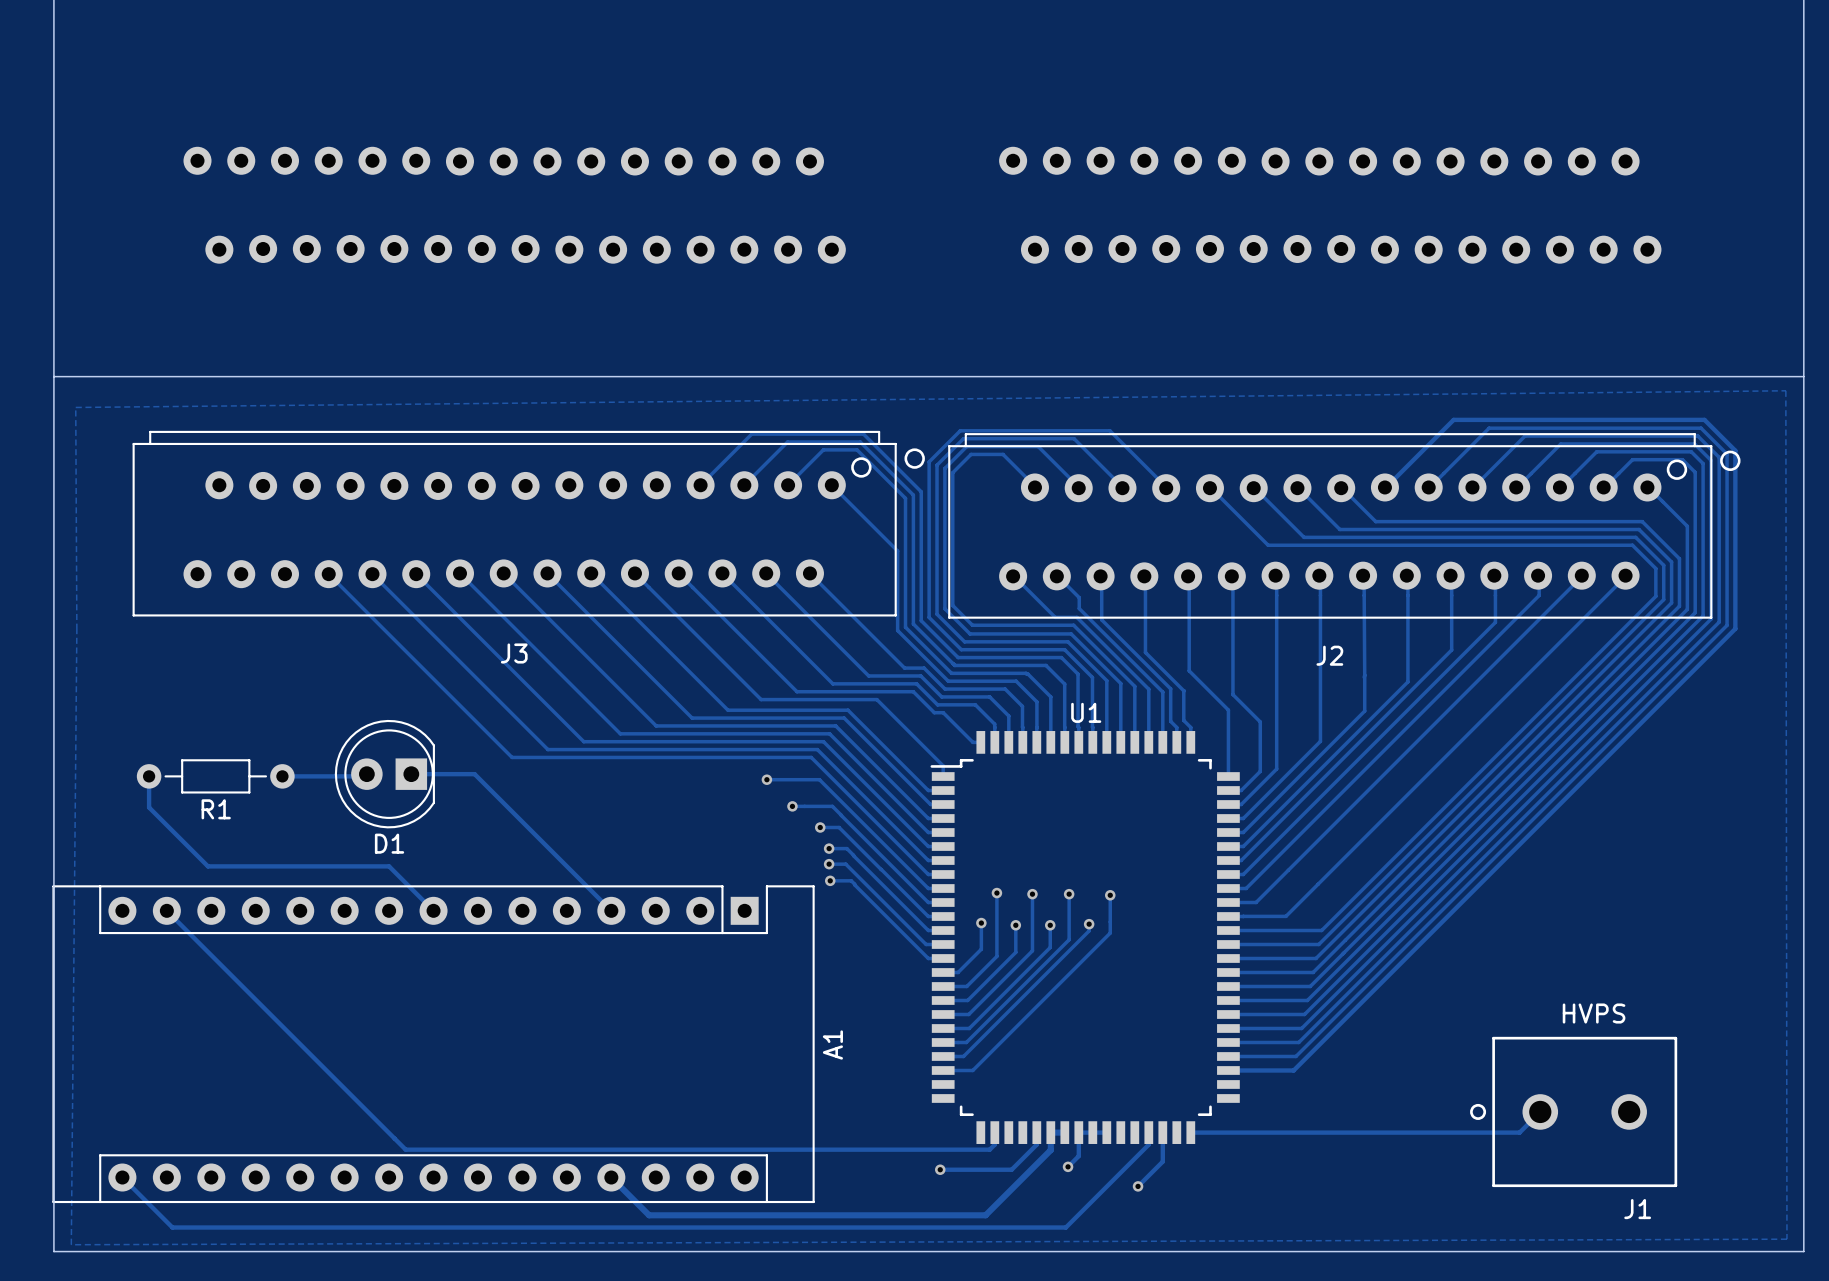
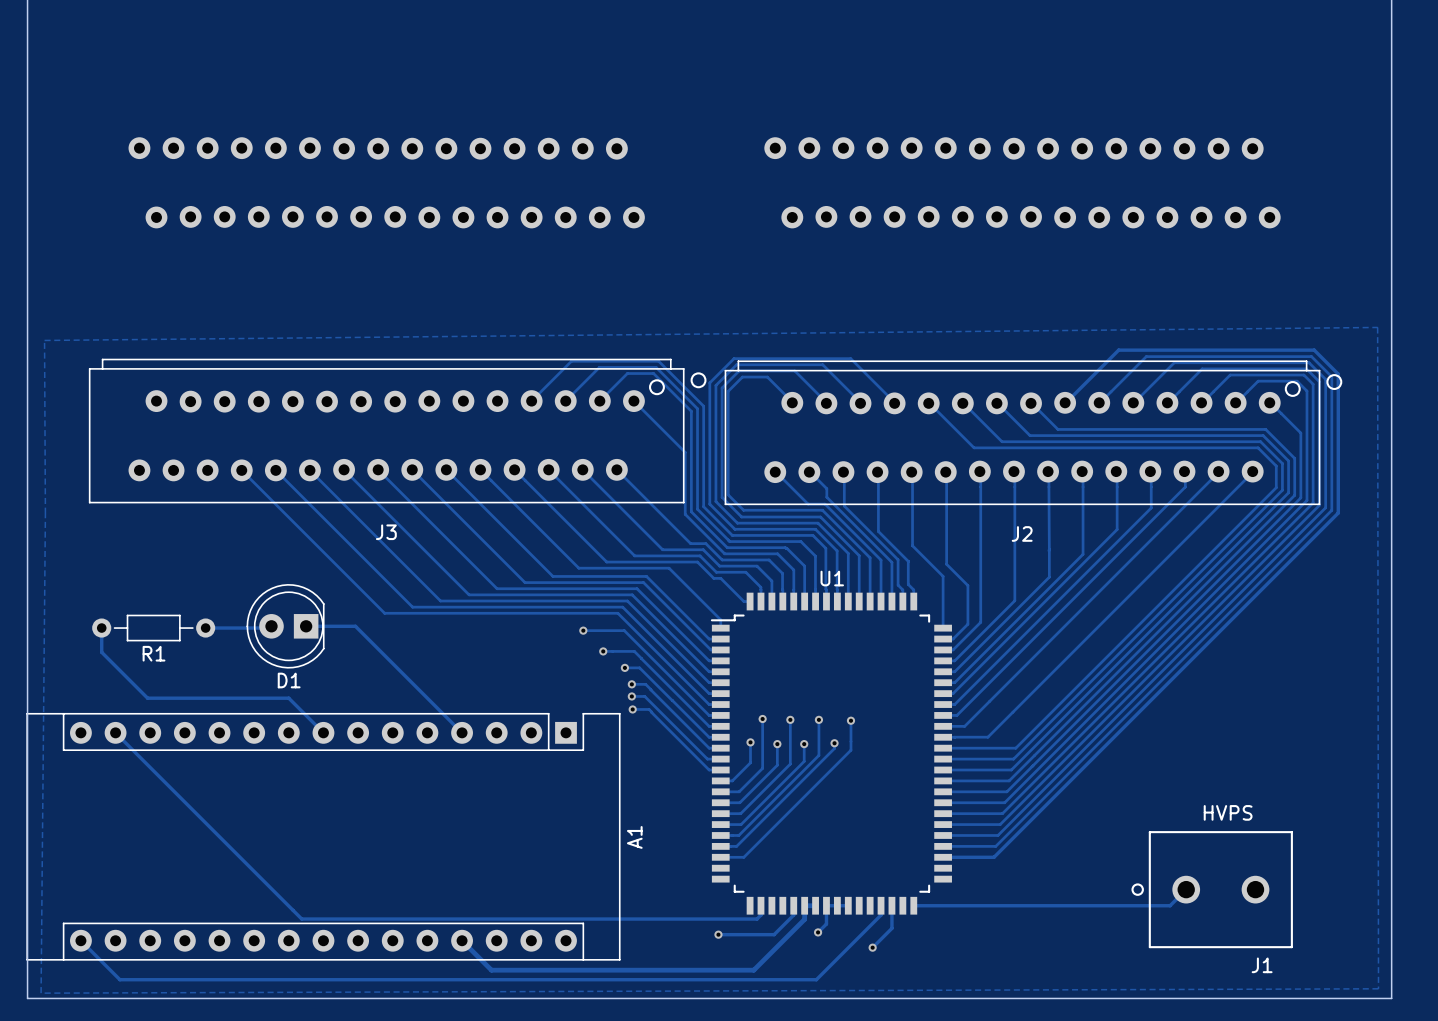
board edge: (53, 376) (1803, 376) -> none

